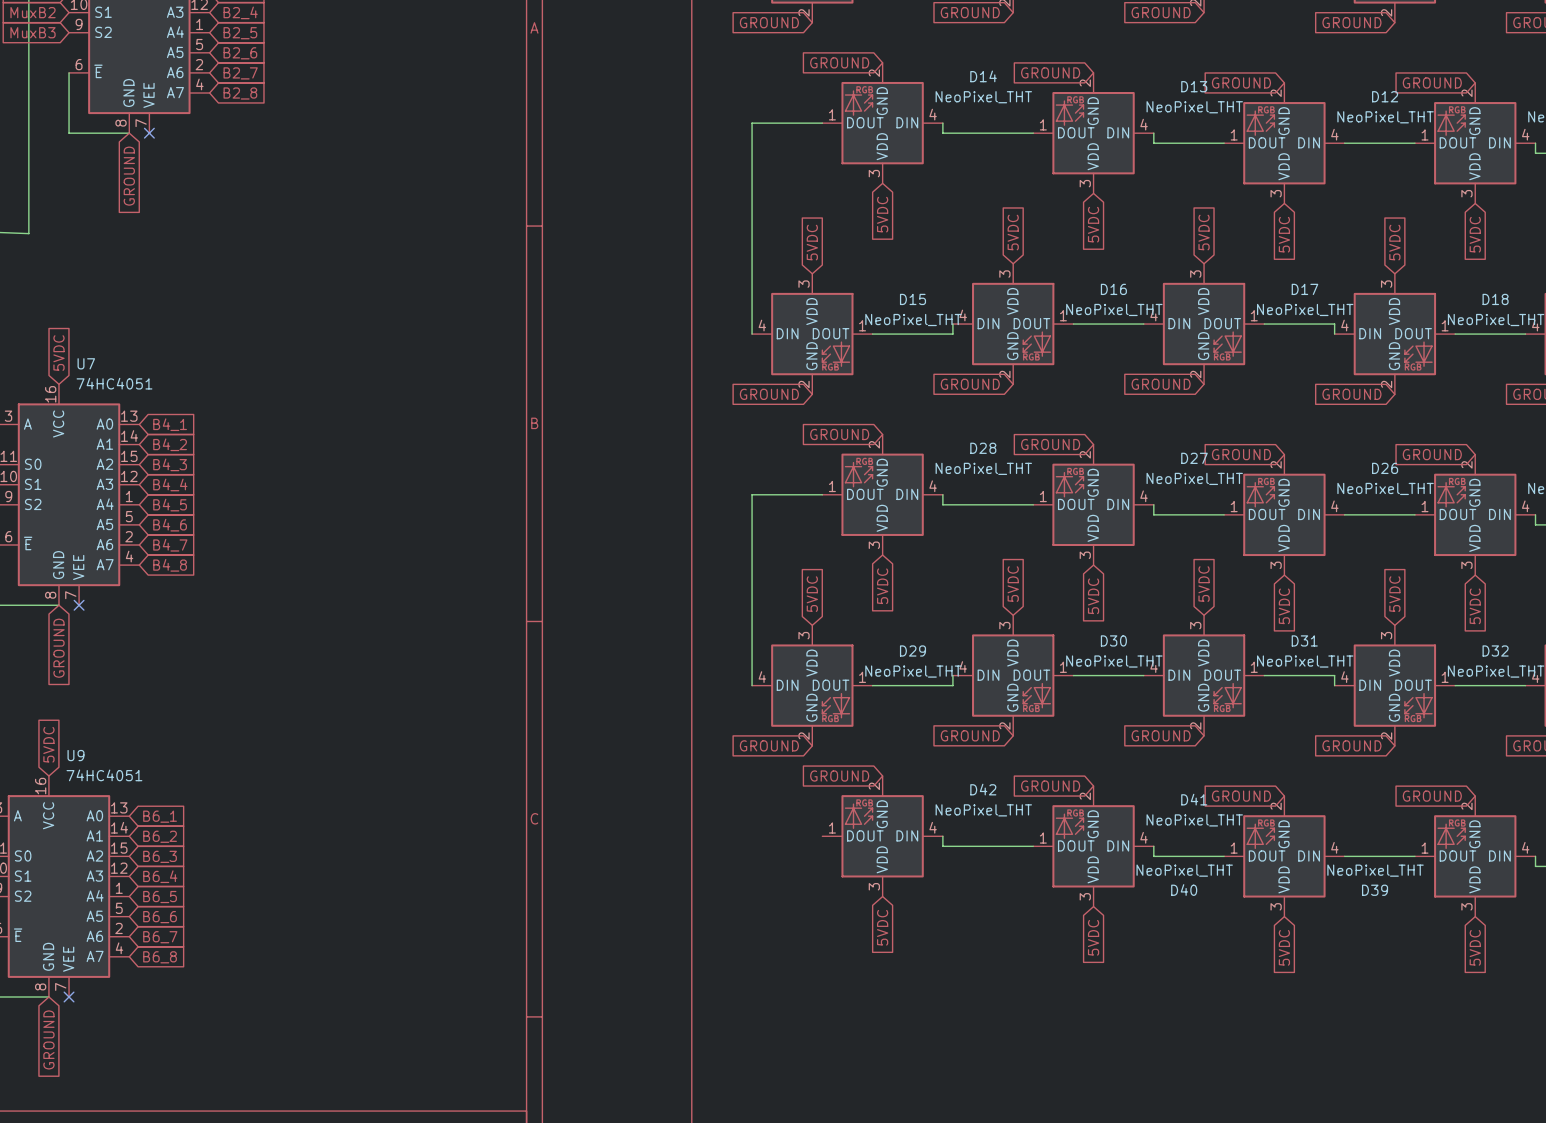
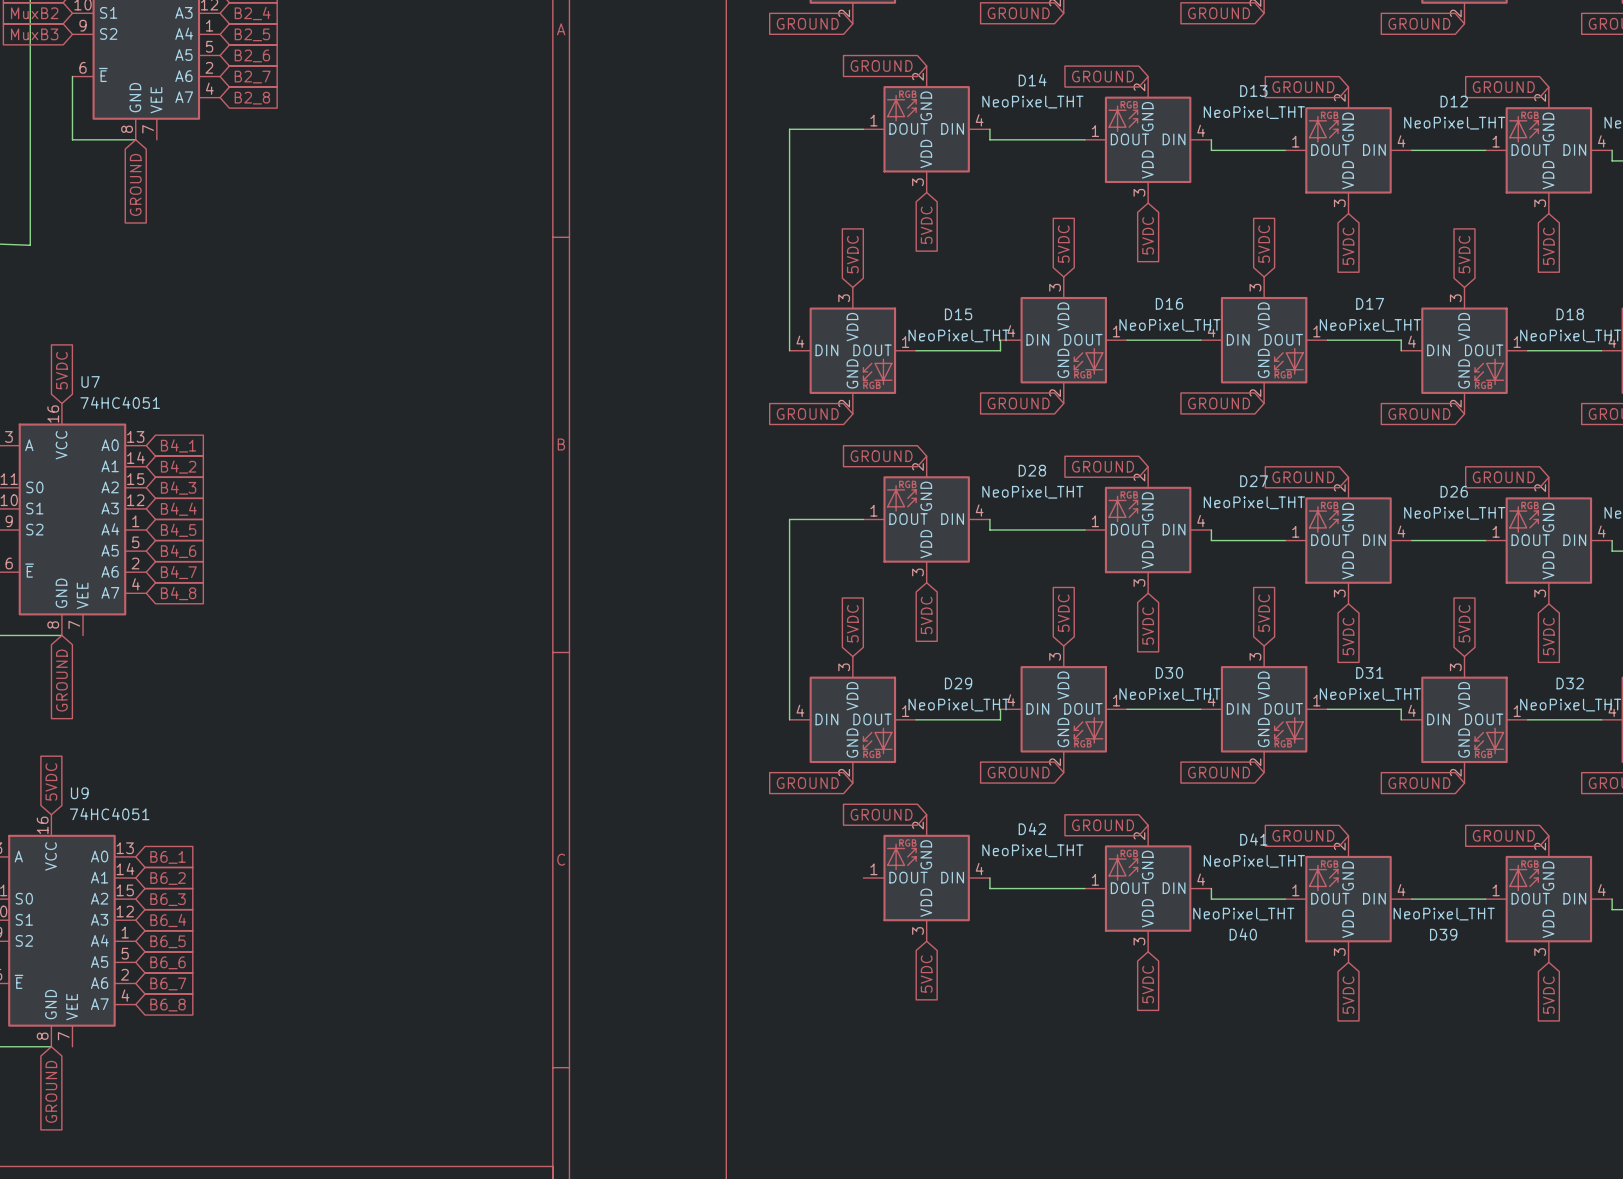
no-connect mark: (149, 133) -> none
no-connect mark: (79, 605) -> none
no-connect mark: (69, 996) -> none

